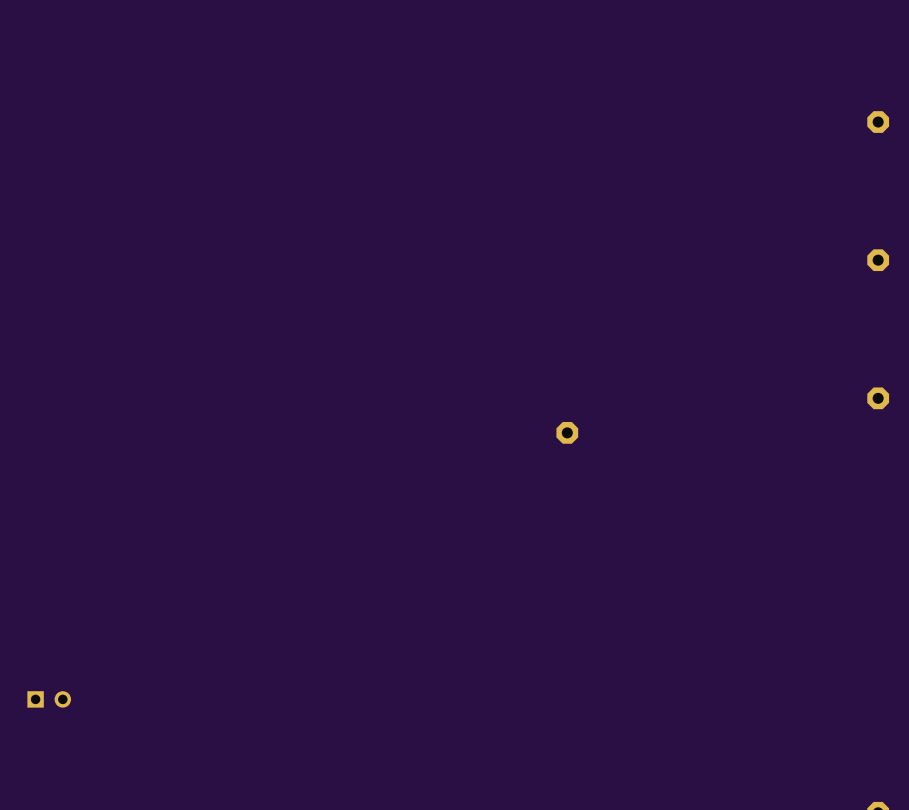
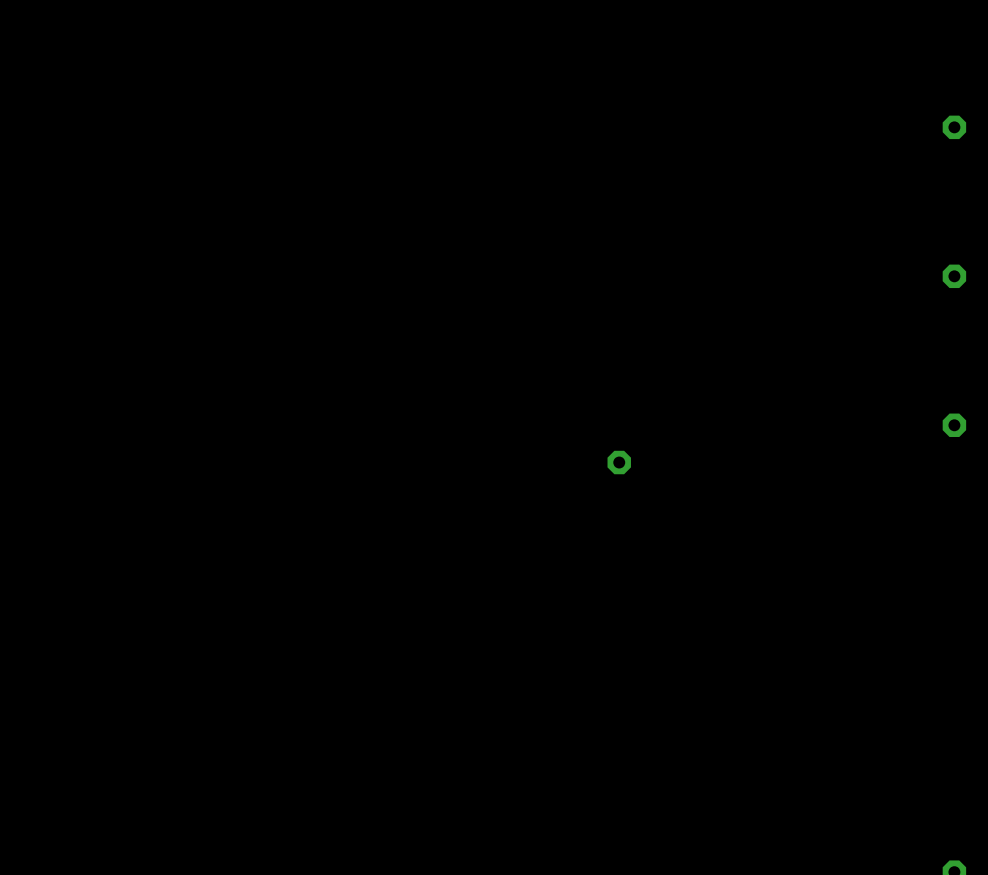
part: (49, 699) -> none

